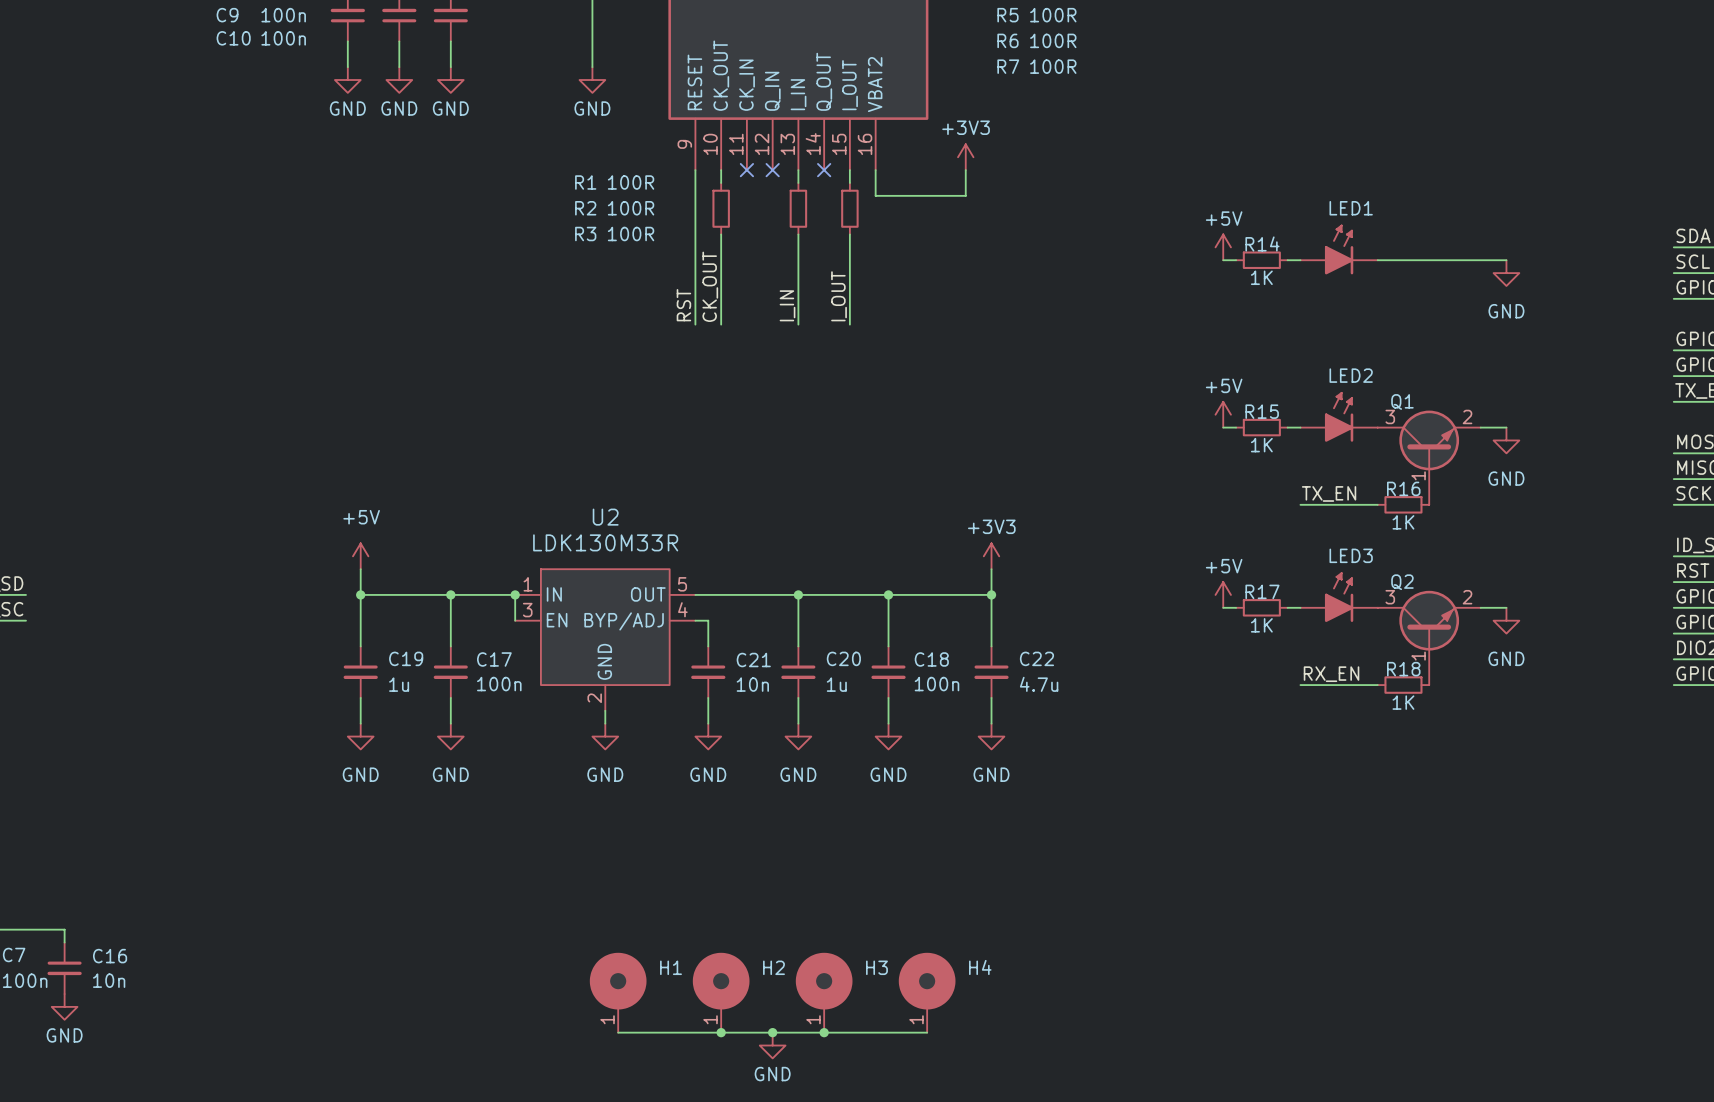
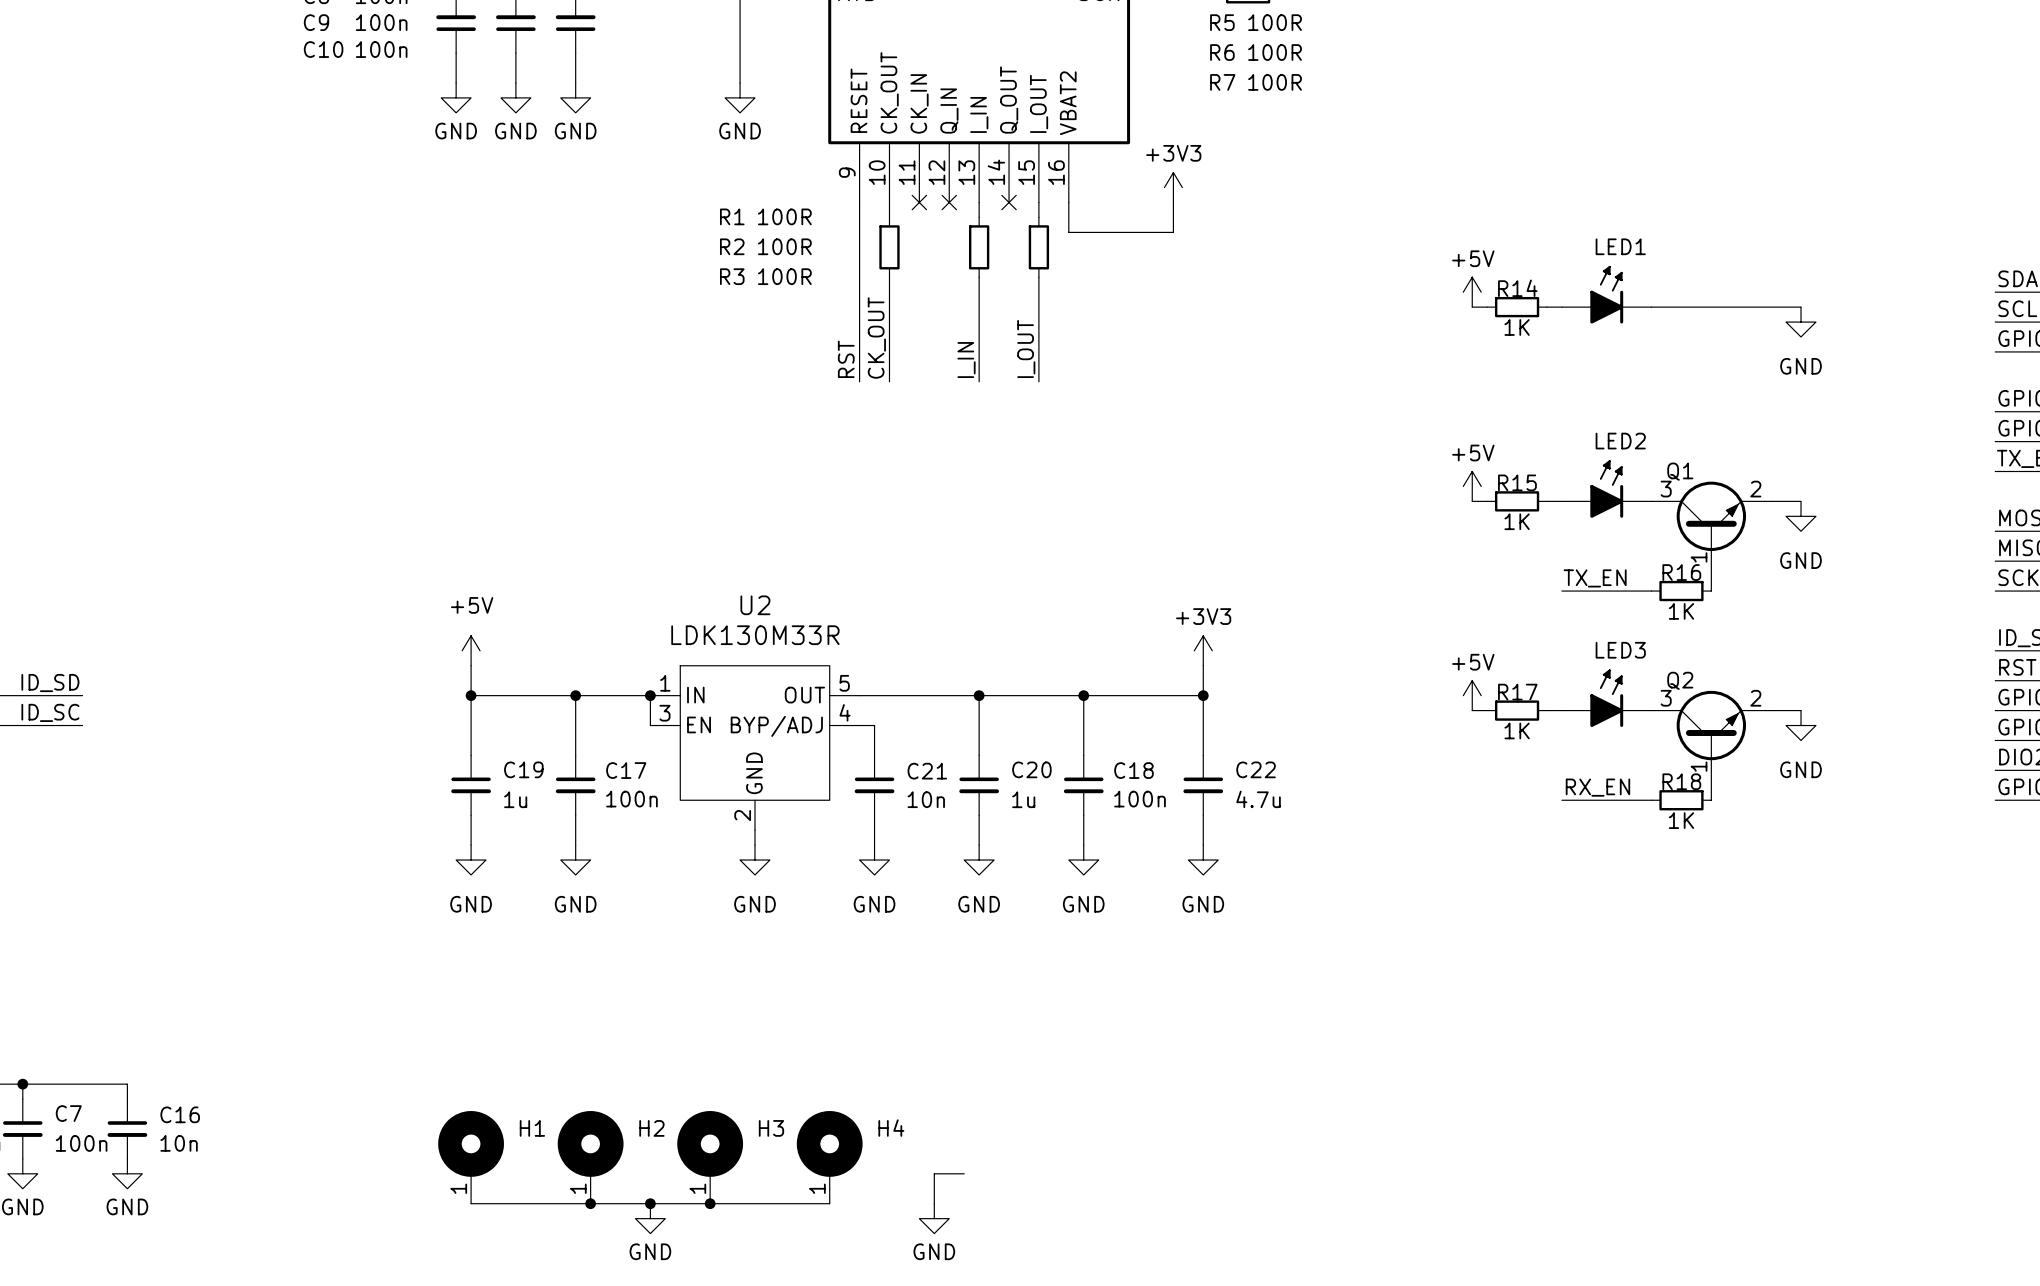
H1 position: (618, 992) -> (471, 1157)
H2 position: (721, 992) -> (590, 1157)
H3 position: (824, 992) -> (710, 1157)
H4 position: (927, 992) -> (829, 1157)
wire: none -> (964, 1173) (934, 1173) (934, 1203)
wire: none -> (471, 1203) (769, 1203)
junction: none -> (590, 1203)
junction: none -> (650, 1203)
junction: none -> (710, 1203)
wire: (669, 1032) (927, 1032) -> none
junction: (721, 1032) -> none
junction: (772, 1032) -> none
junction: (824, 1032) -> none
power symbol: none -> GND (650, 1218)
power symbol position: GND (772, 1045) -> GND (934, 1218)

